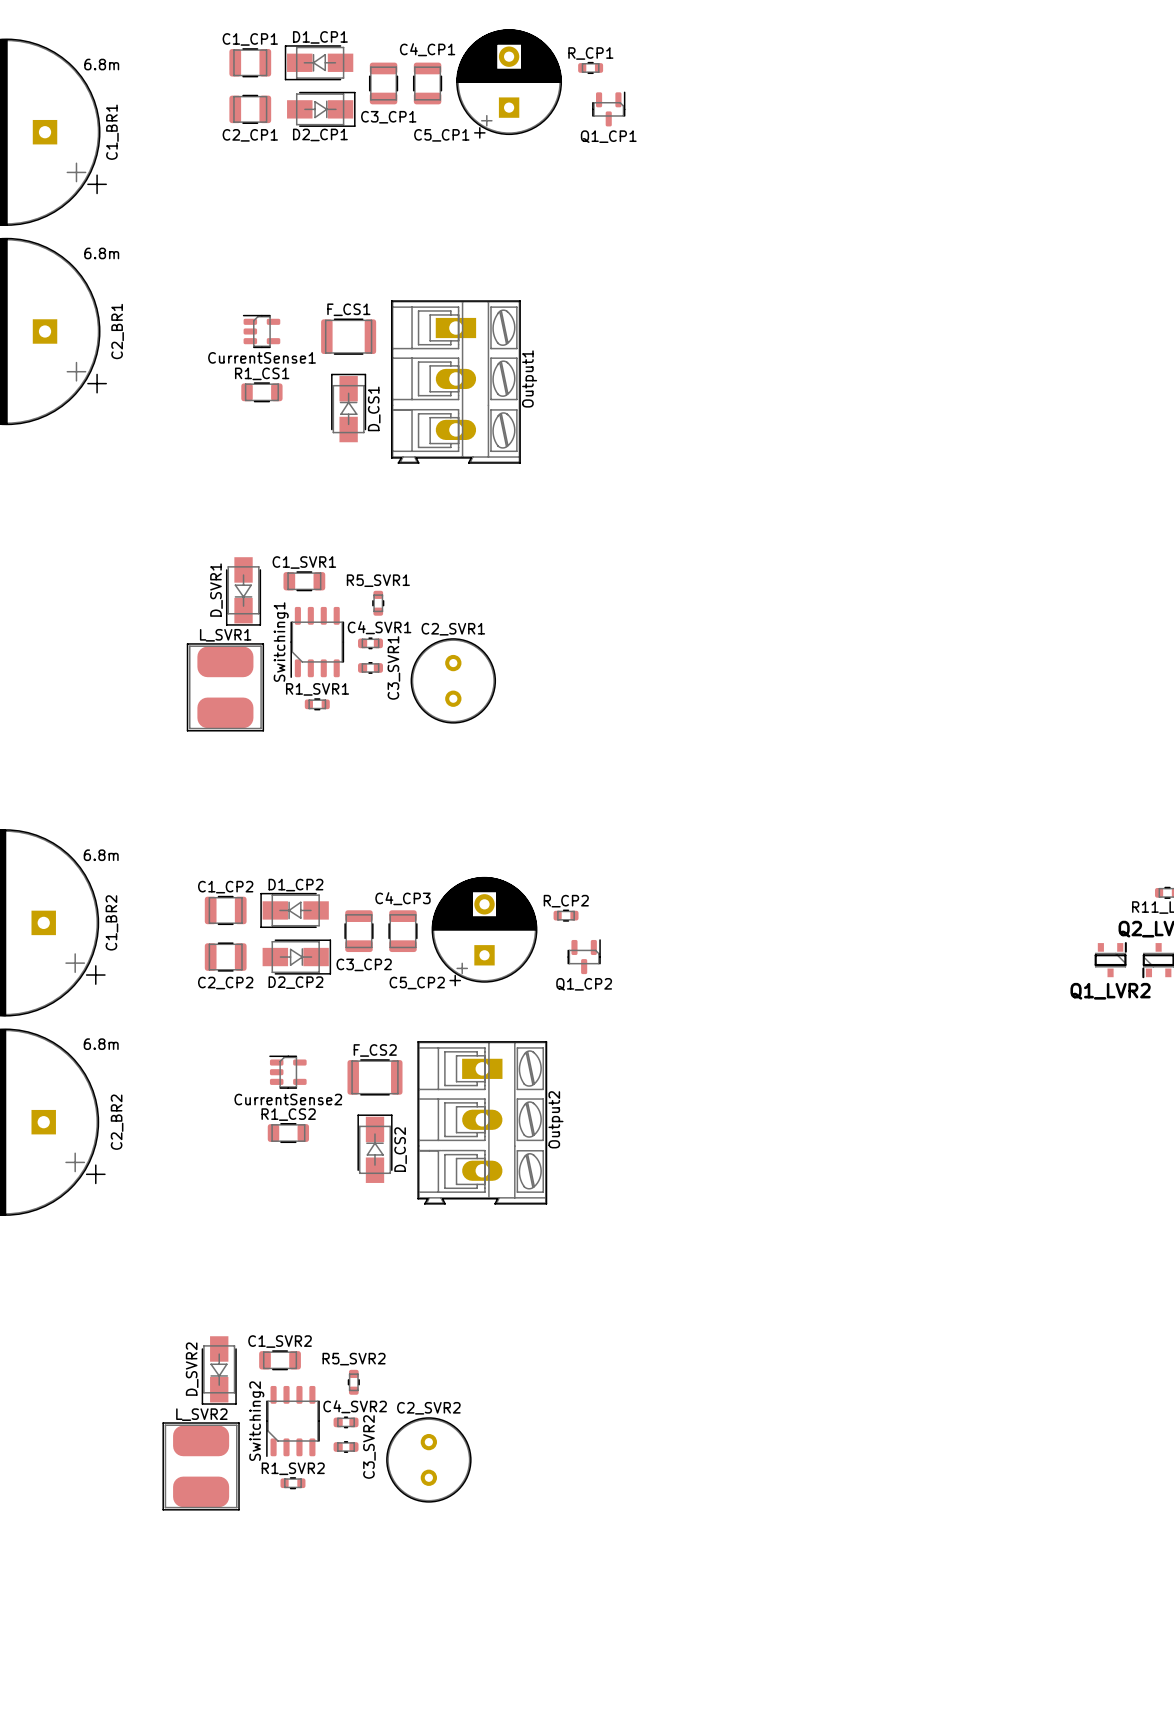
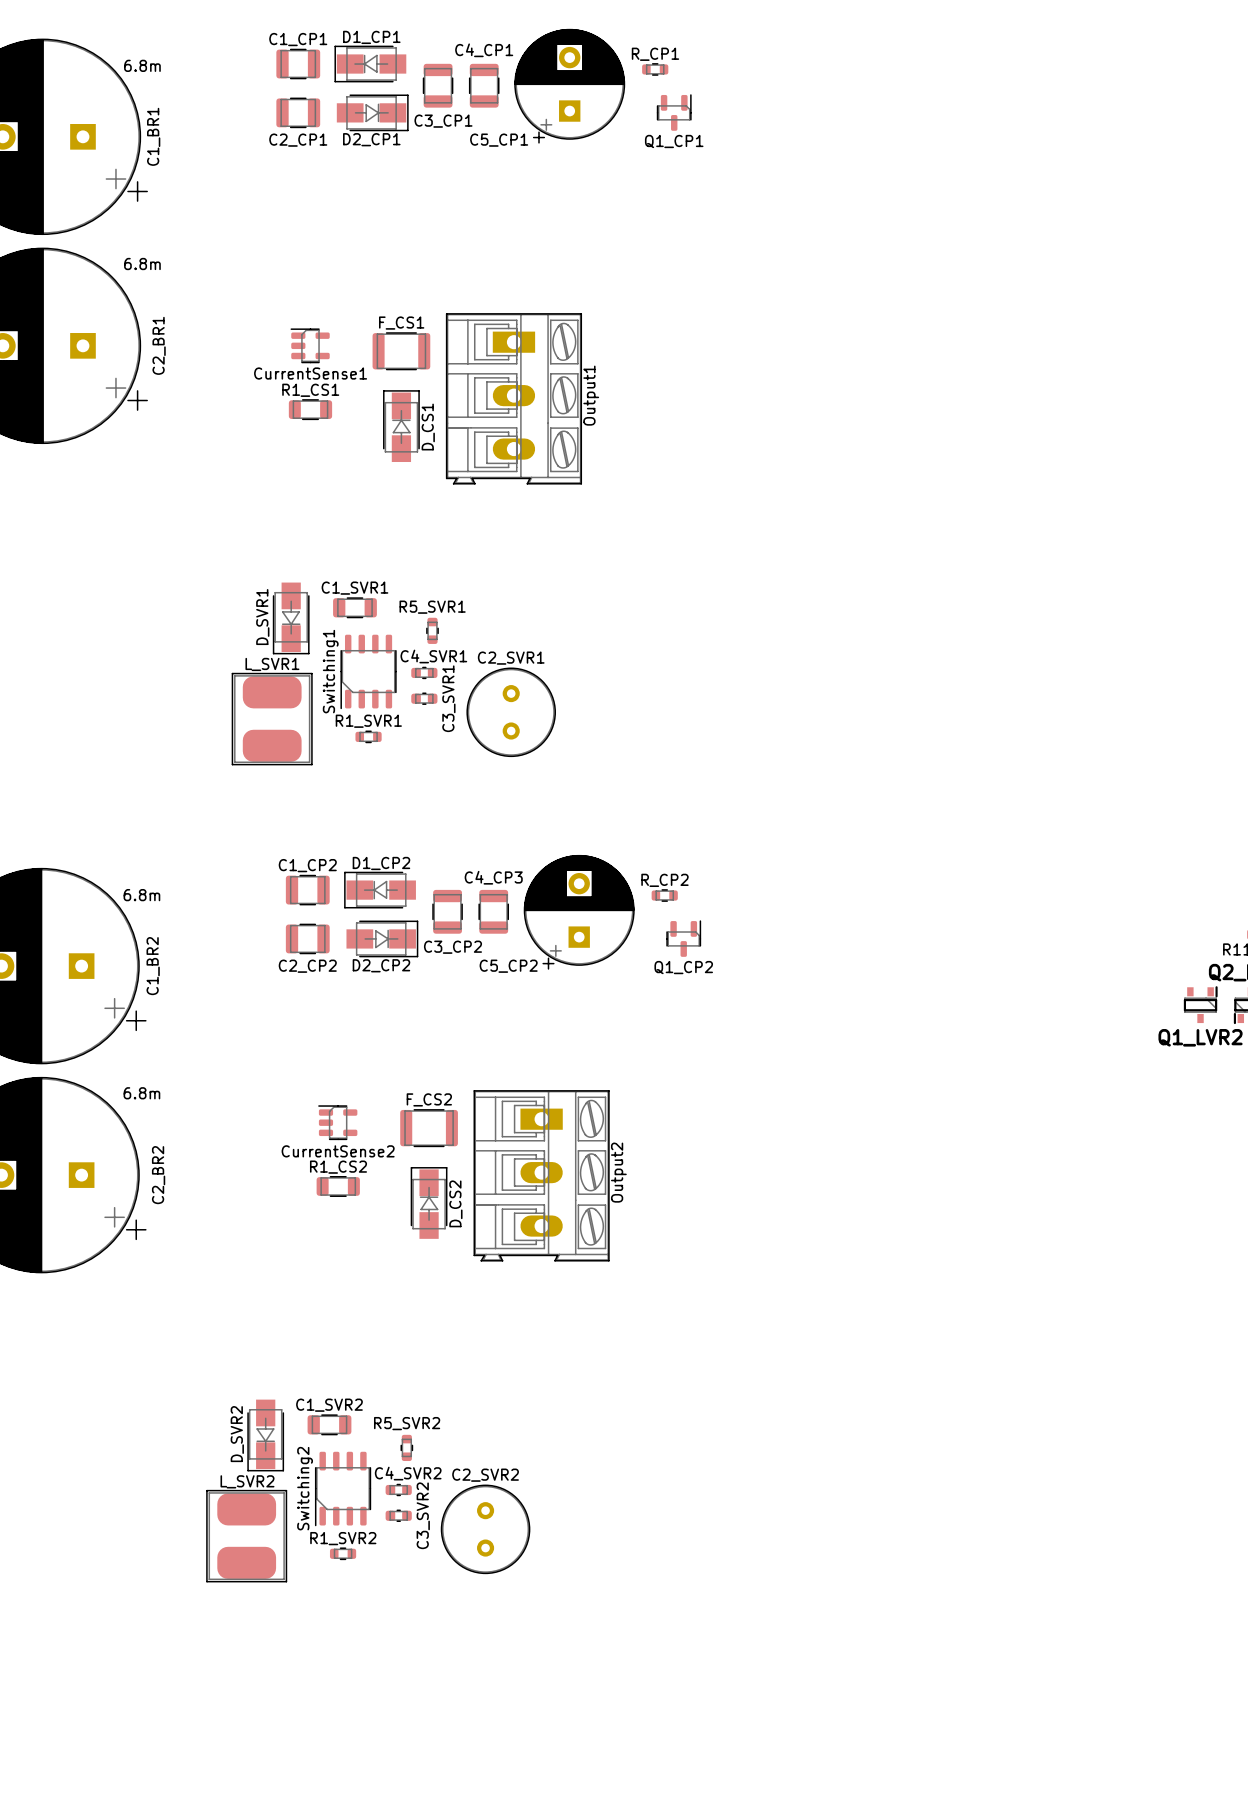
C1_CP2 position: (225, 910) -> (307, 890)
D1_CP2 position: (294, 910) -> (380, 890)
R_CP2 position: (566, 915) -> (664, 895)
C3_CP2 position: (358, 931) -> (447, 911)
C4_CP3 position: (402, 931) -> (493, 911)
C5_CP2 position: (484, 931) -> (579, 912)
Q1_CP2 position: (584, 956) -> (683, 938)
C2_CP2 position: (225, 957) -> (307, 938)
D2_CP2 position: (296, 957) -> (382, 938)

